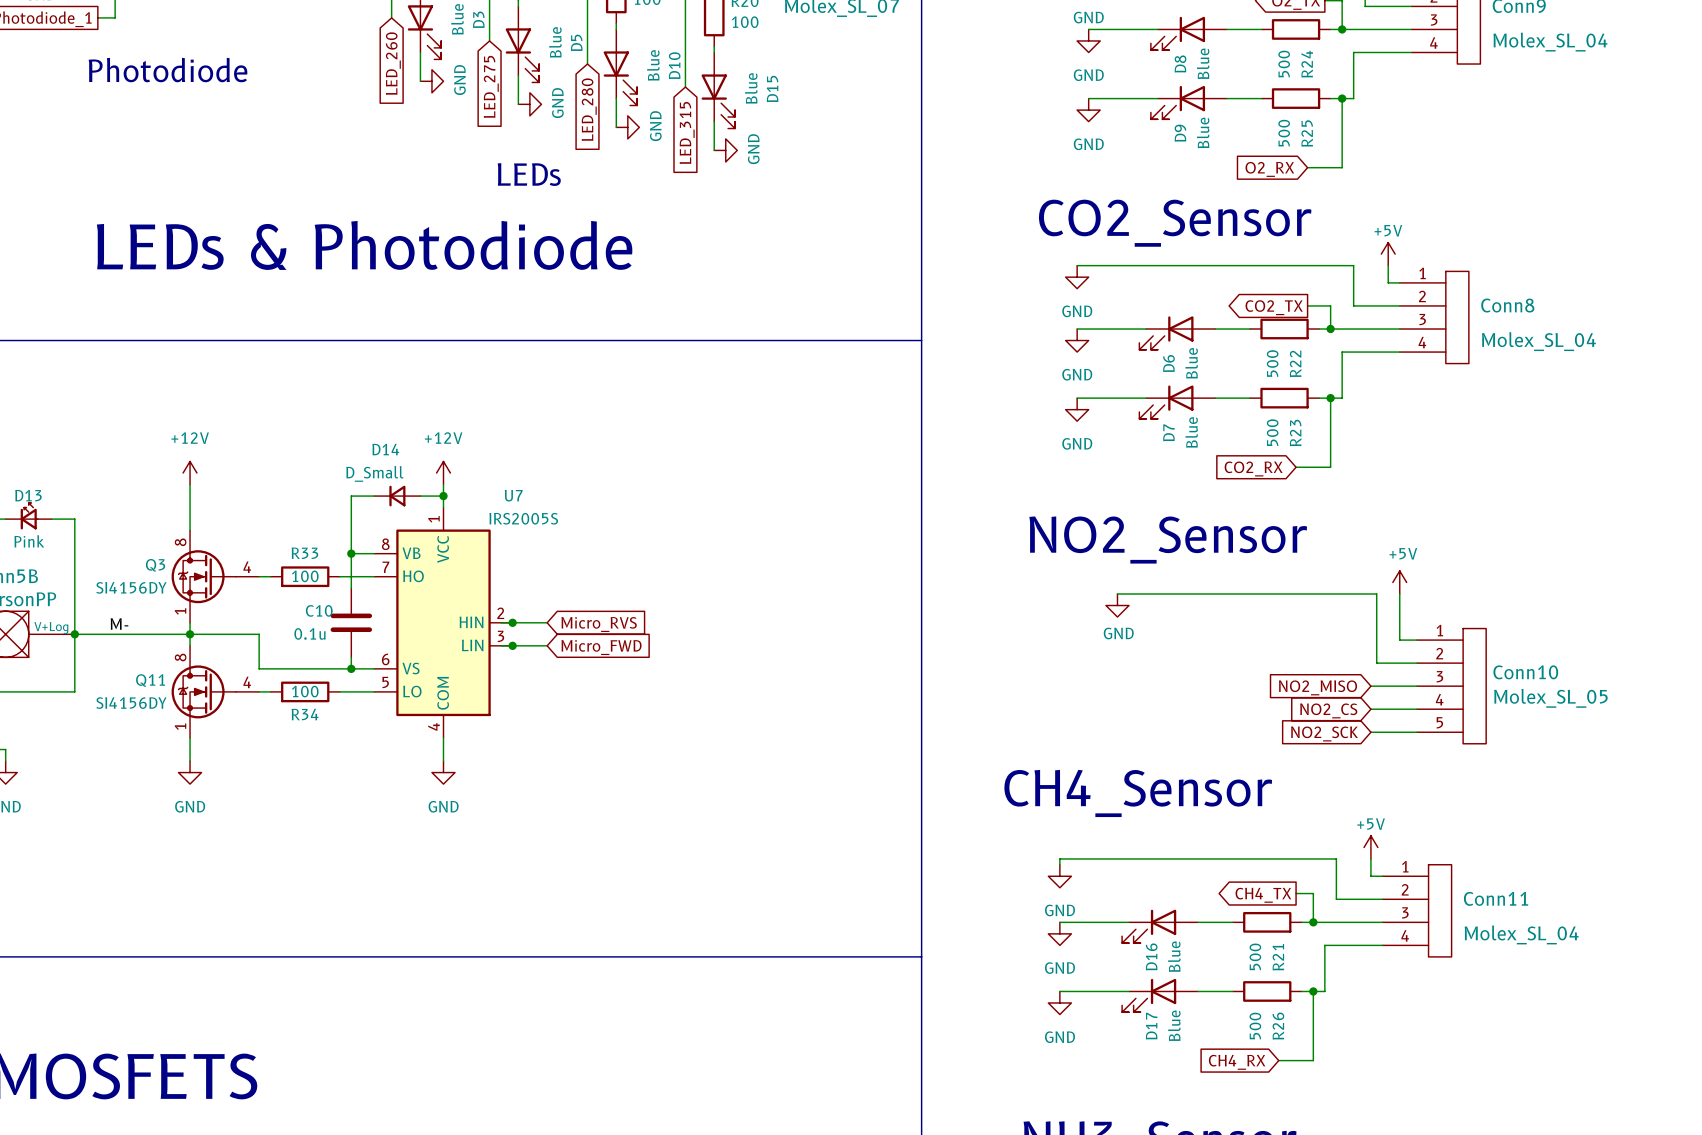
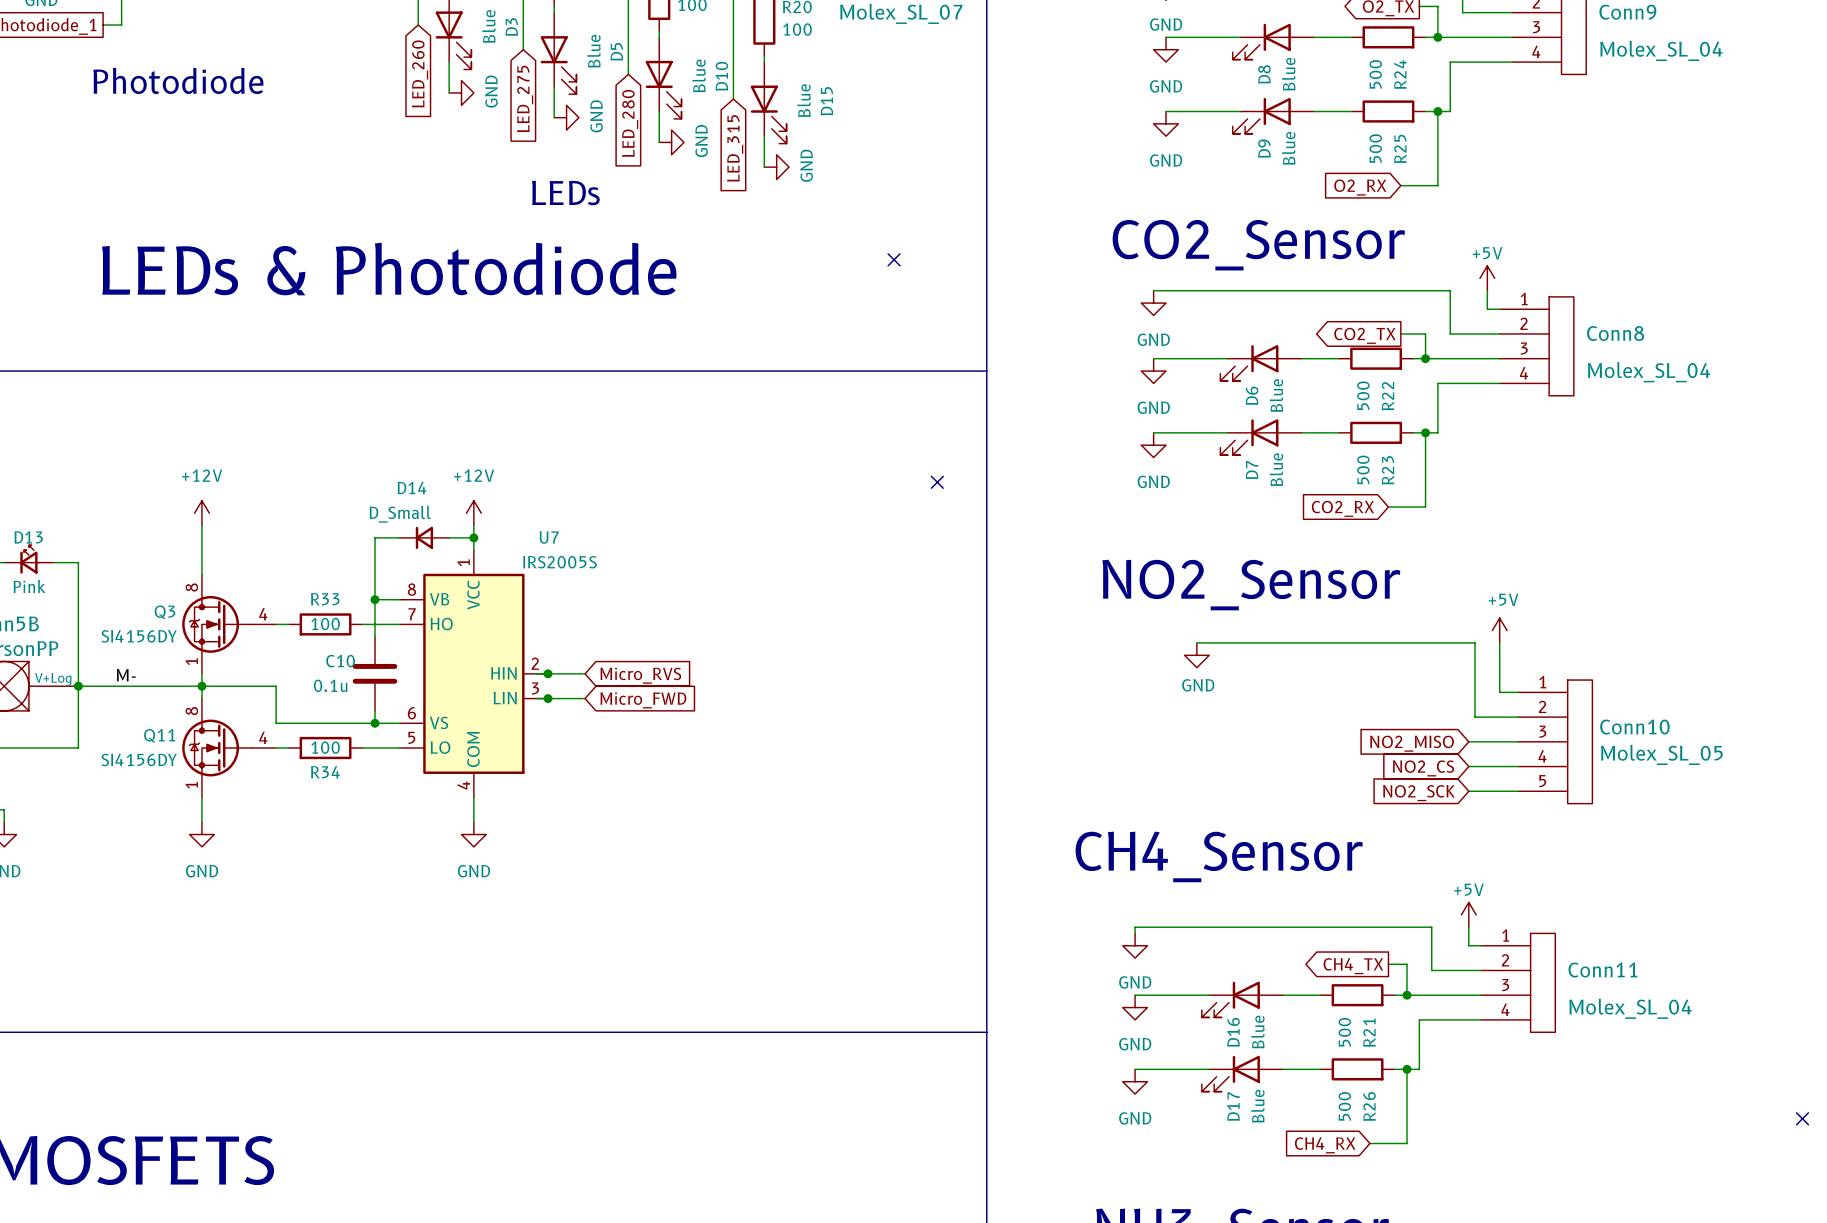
no-connect mark: none -> (894, 259)
no-connect mark: none -> (937, 482)
no-connect mark: none -> (1802, 1118)

